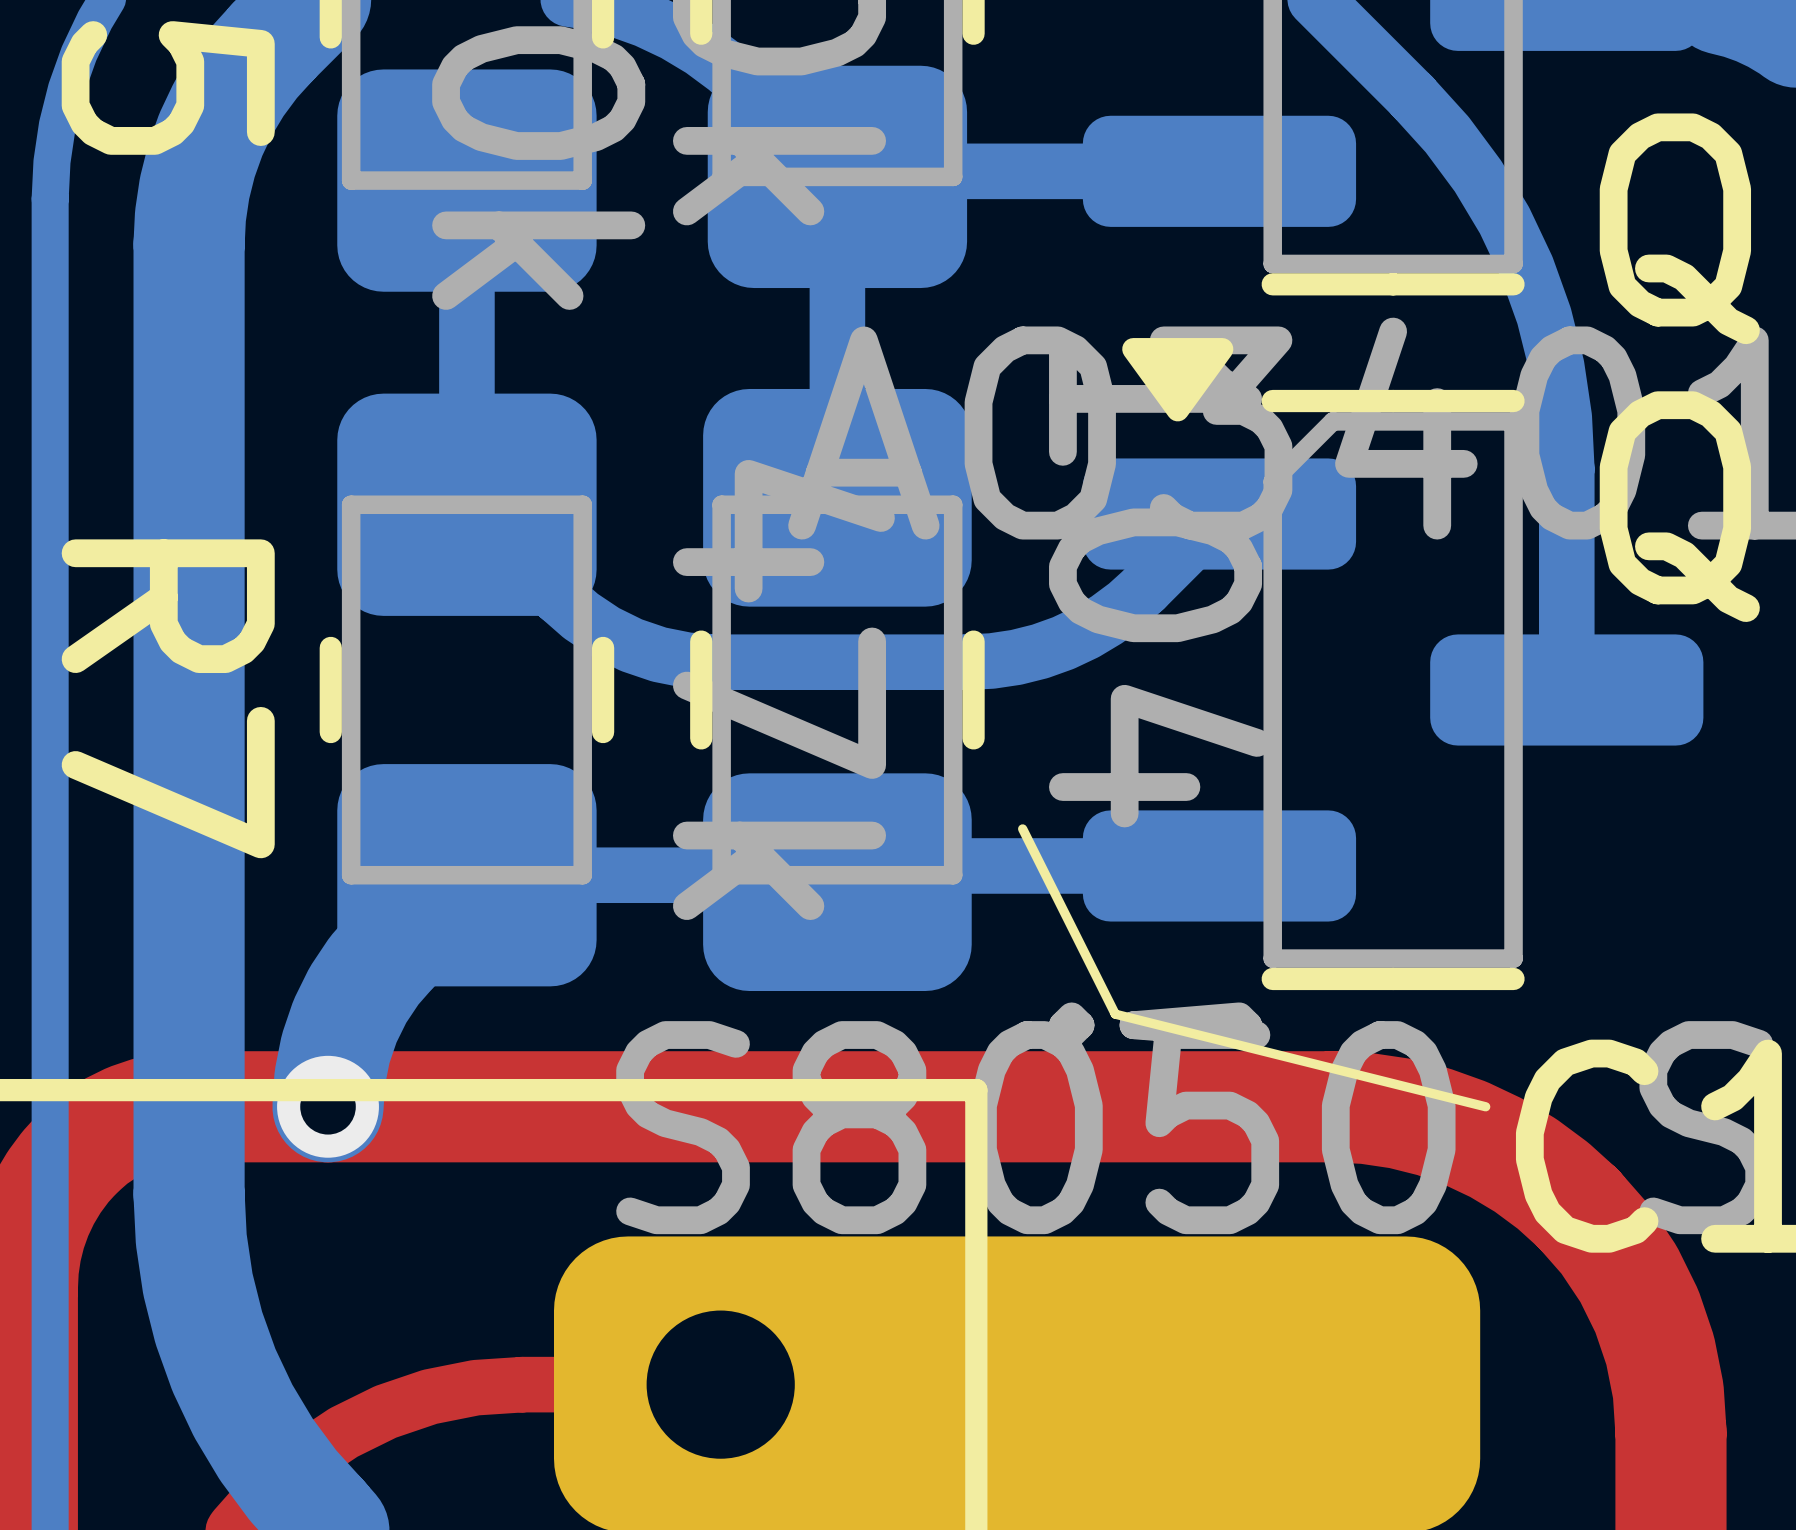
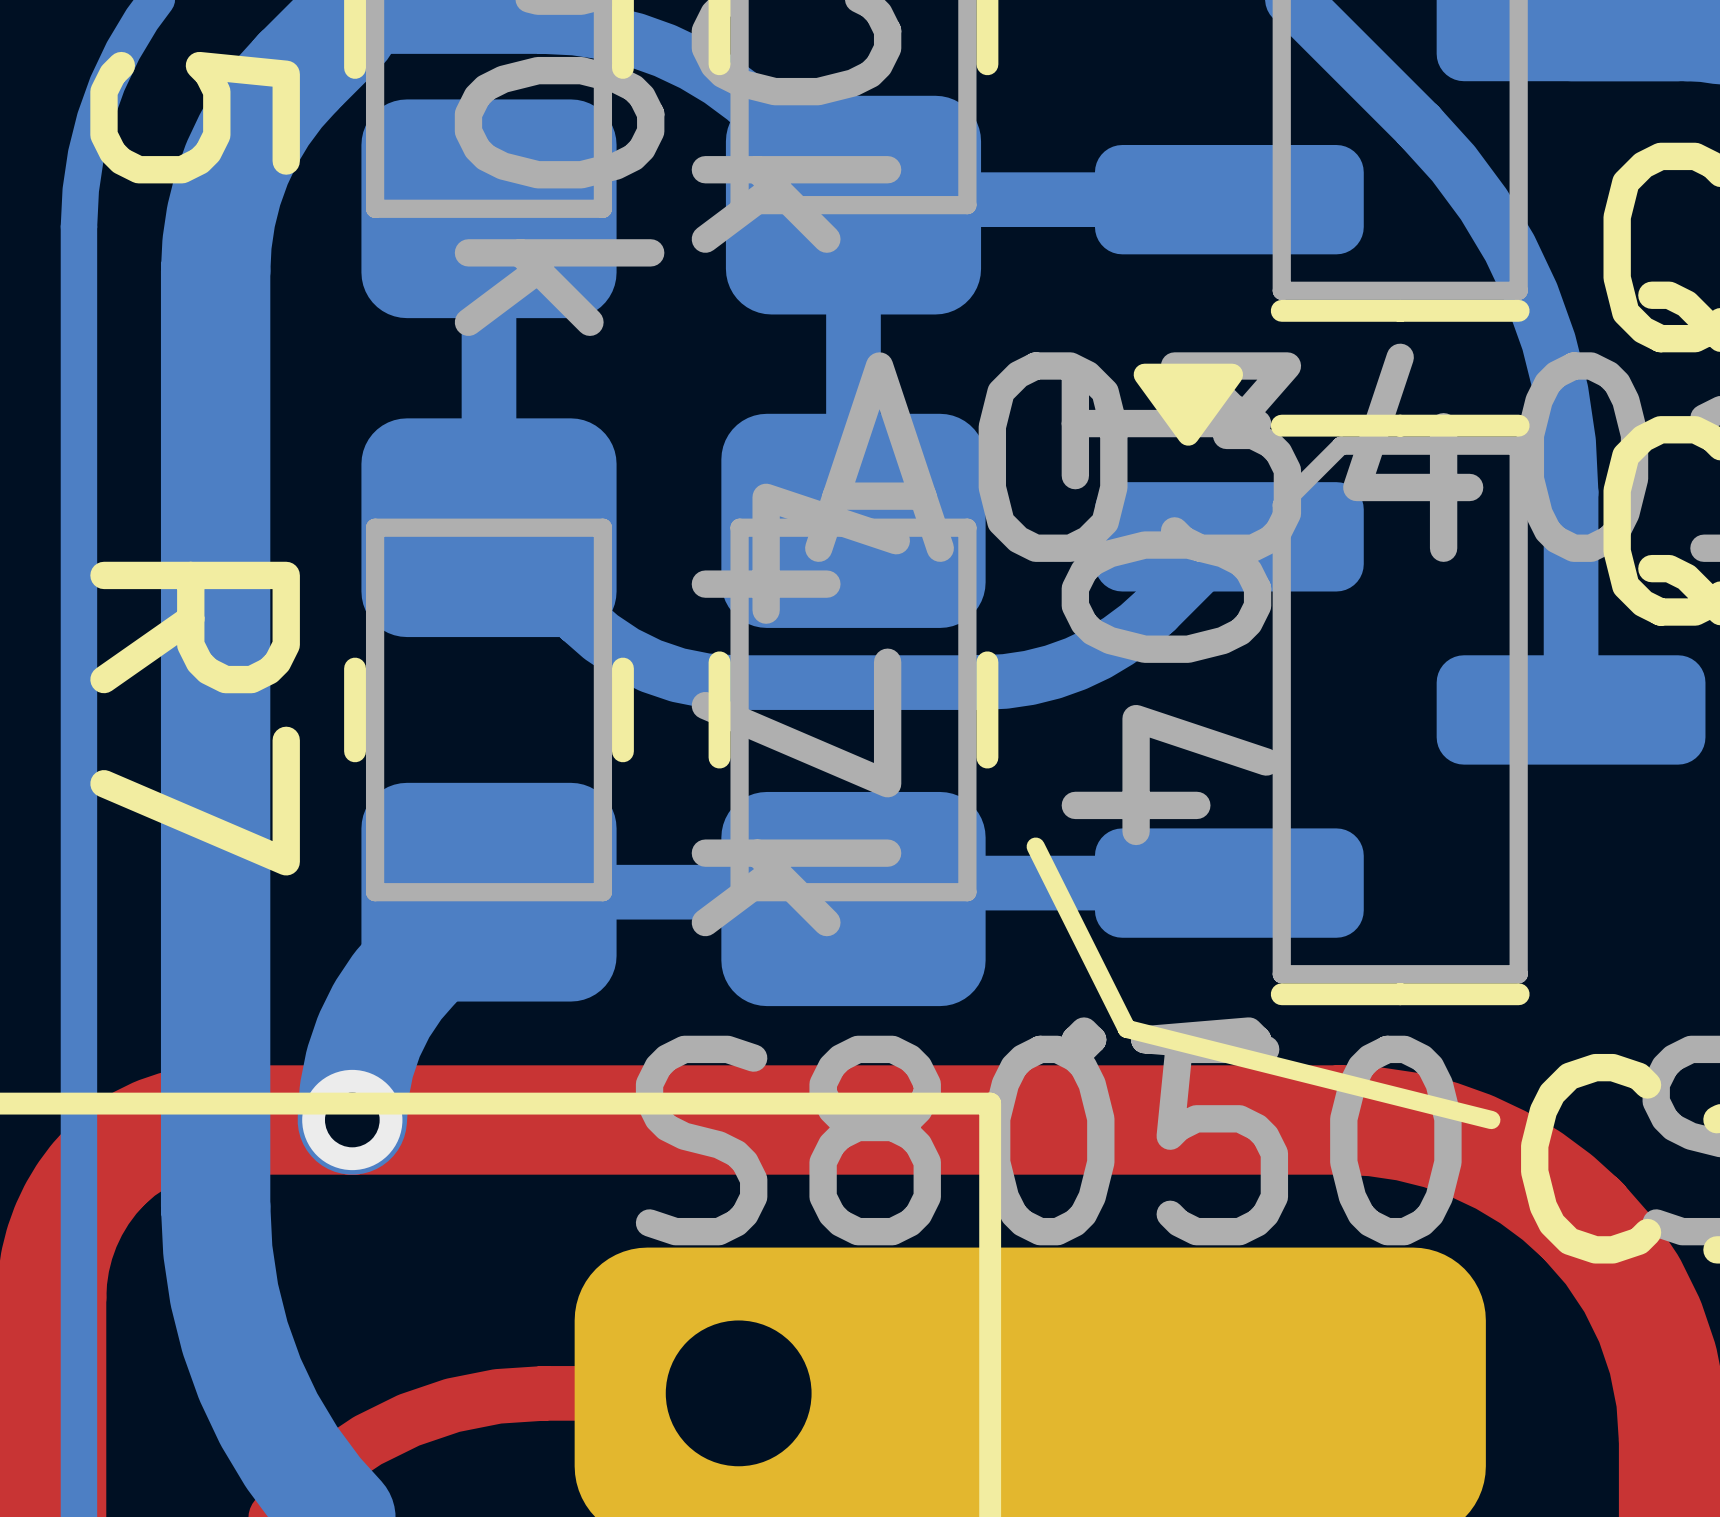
line width: thin (1022, 828) (1115, 1014) (1485, 1106) -> thick (1035, 846) (1126, 1028) (1491, 1120)

